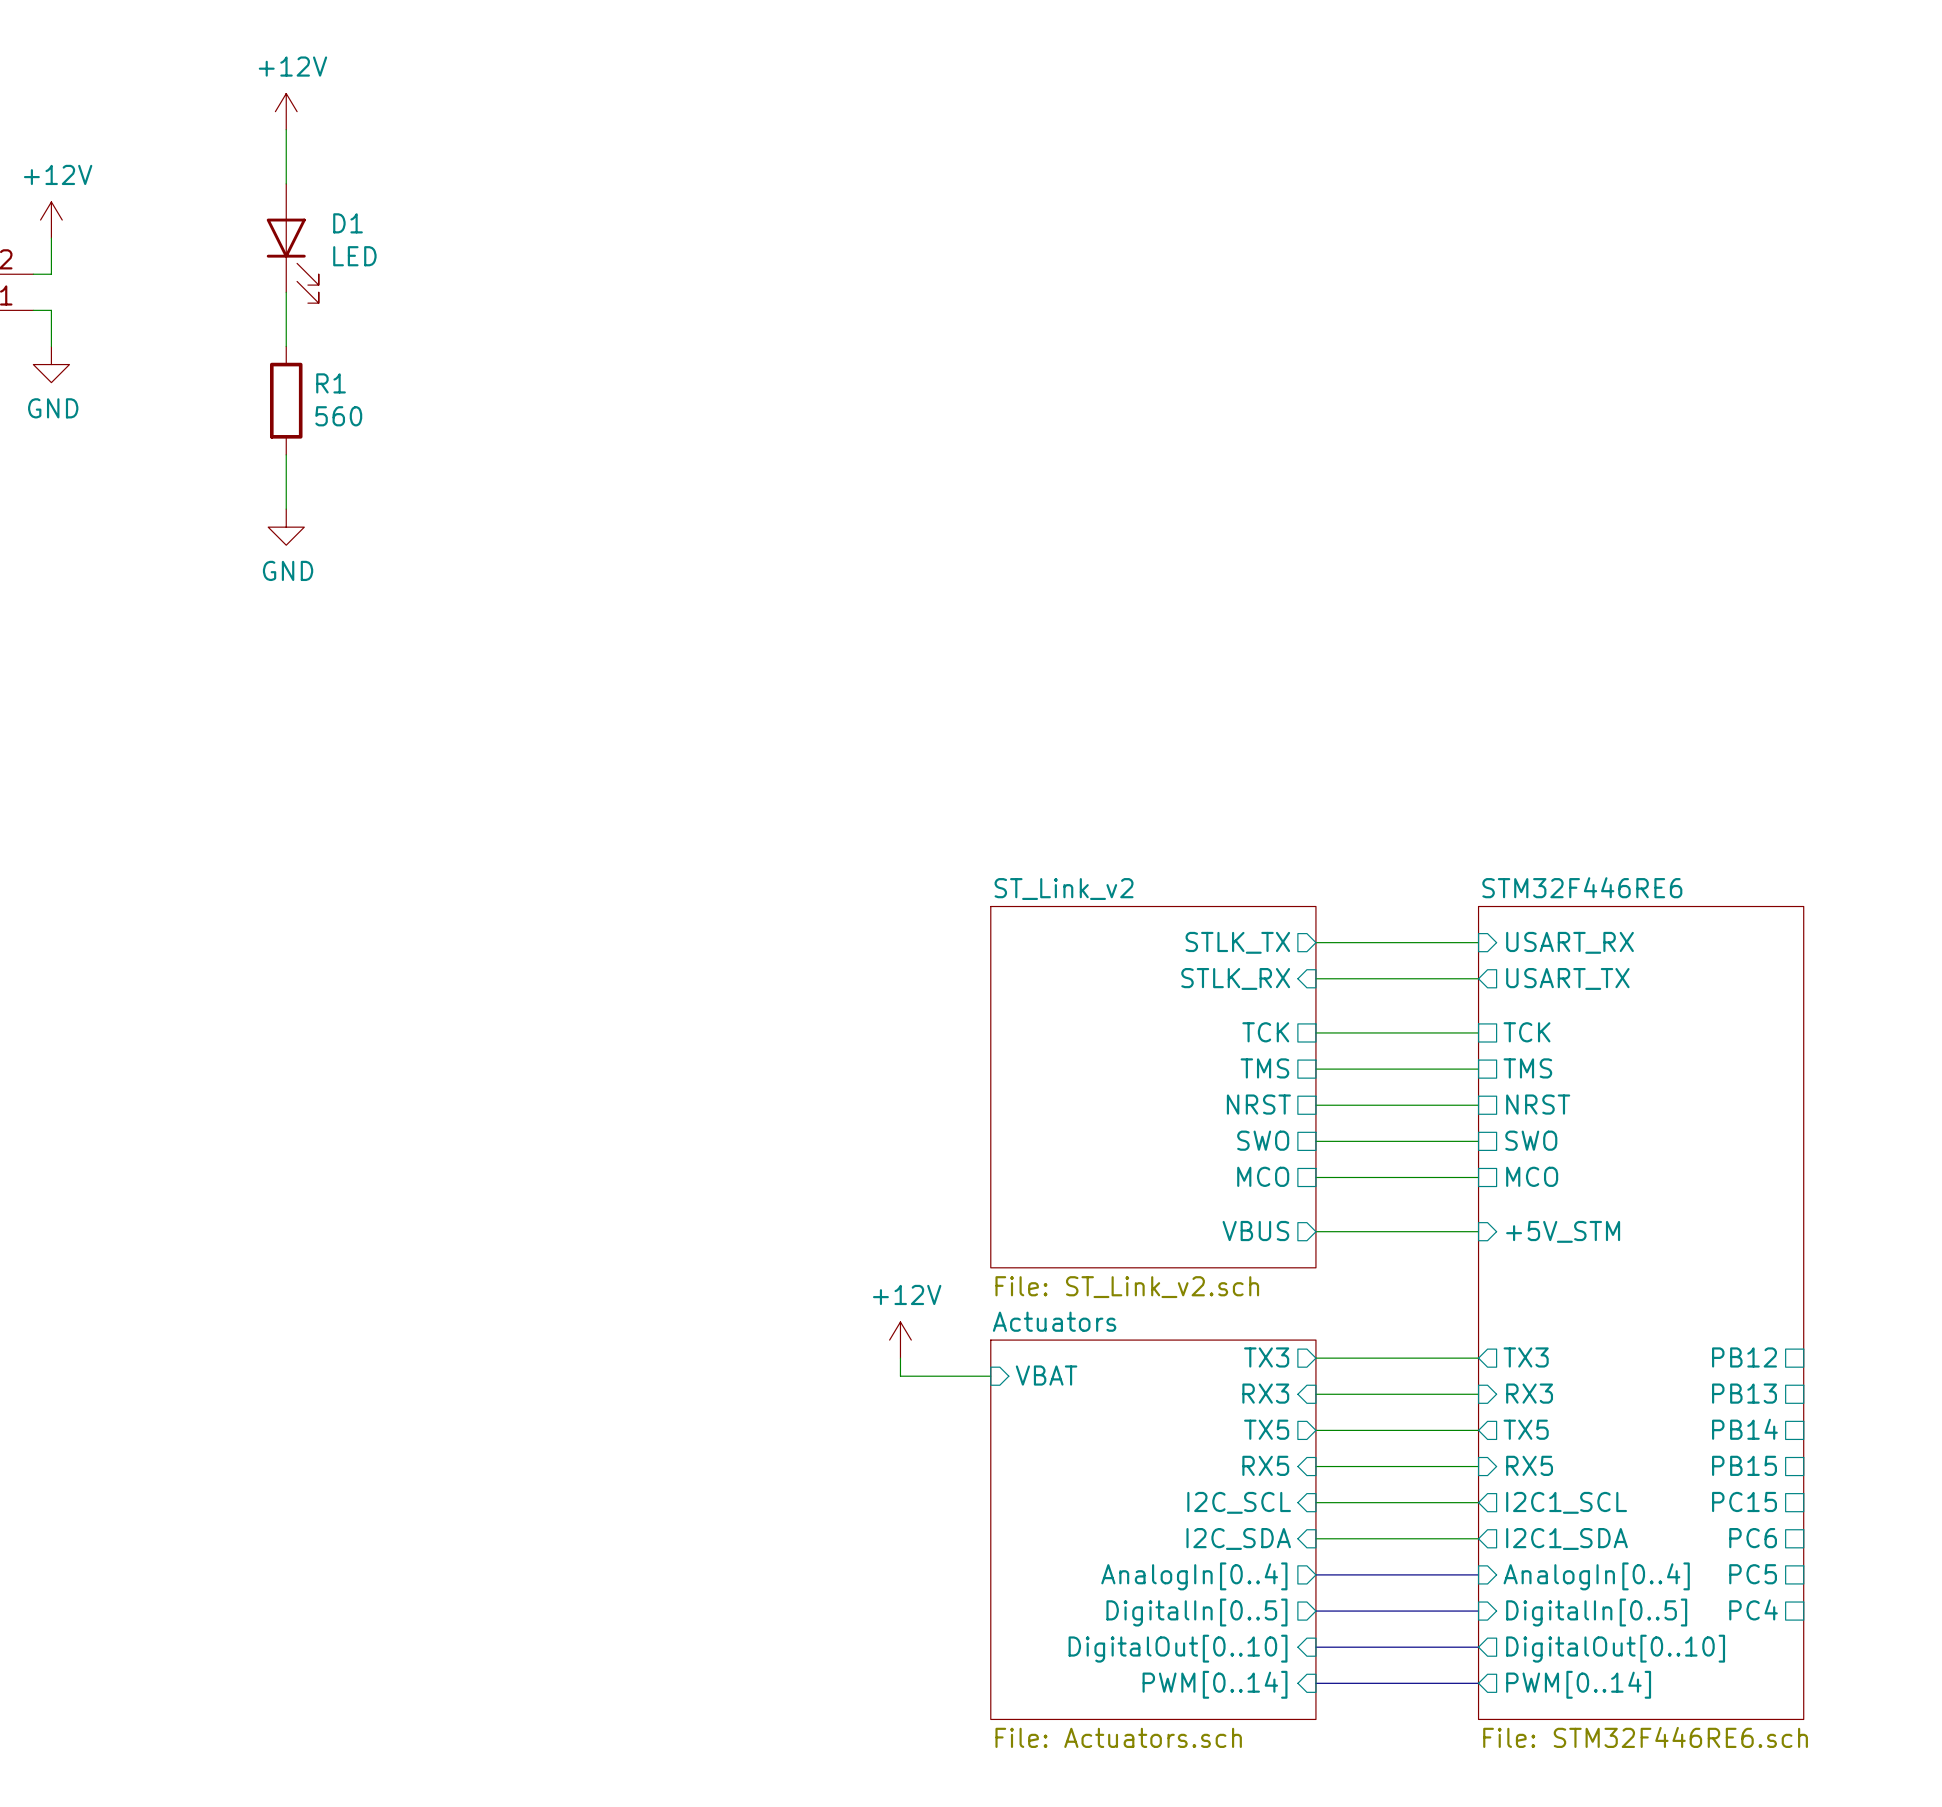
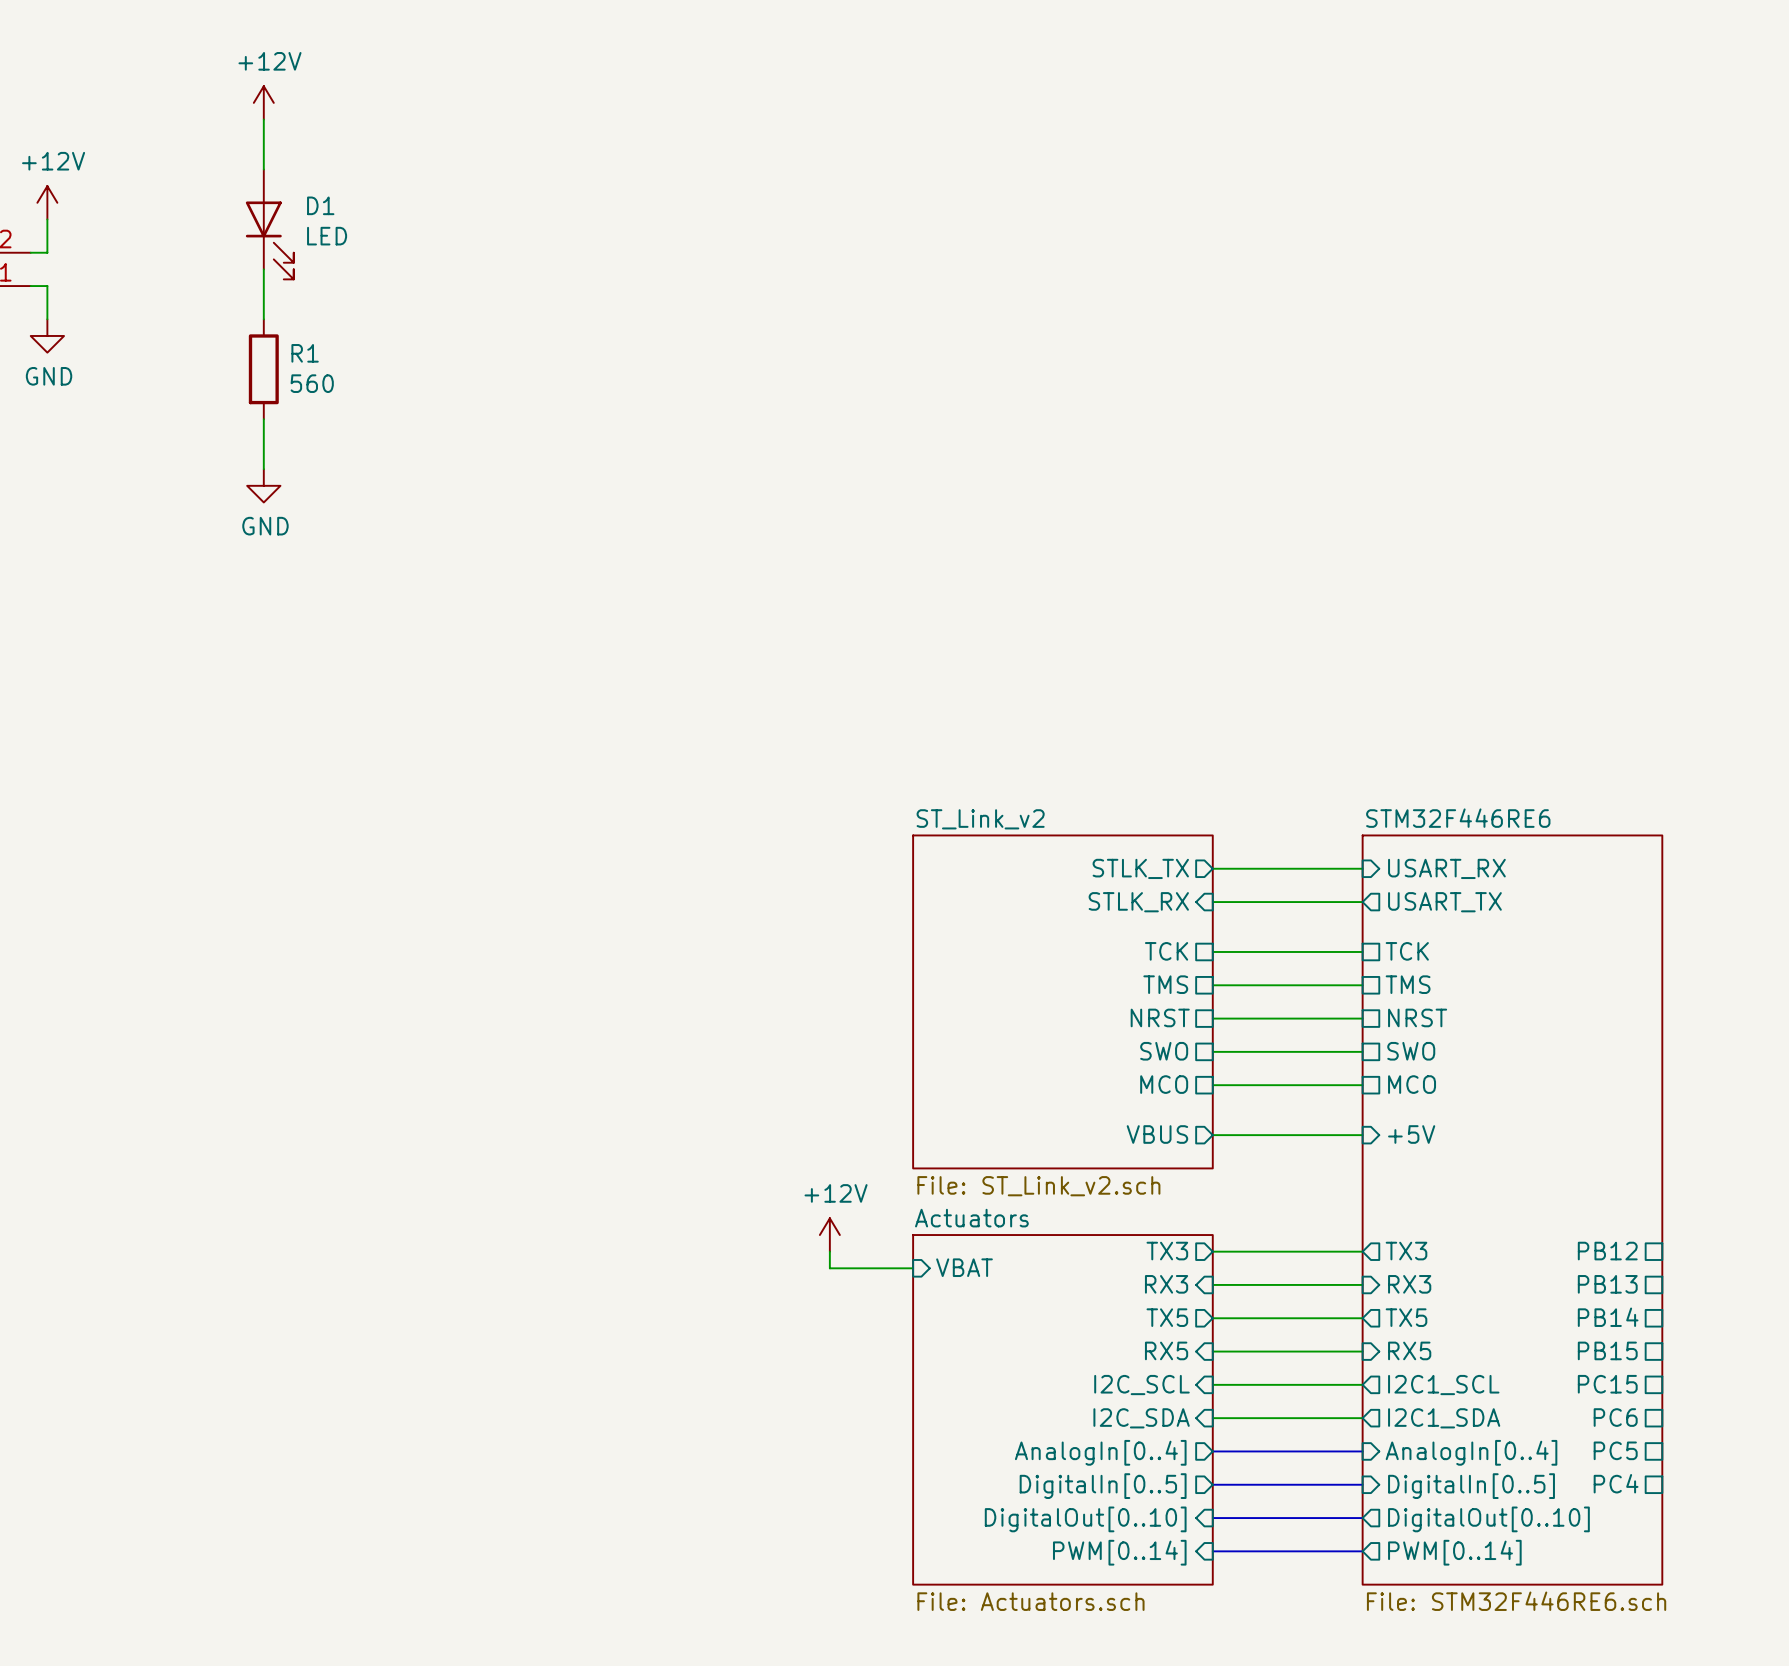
sheet pin: +5V_STM (1563, 1231) -> +5V (1411, 1134)

